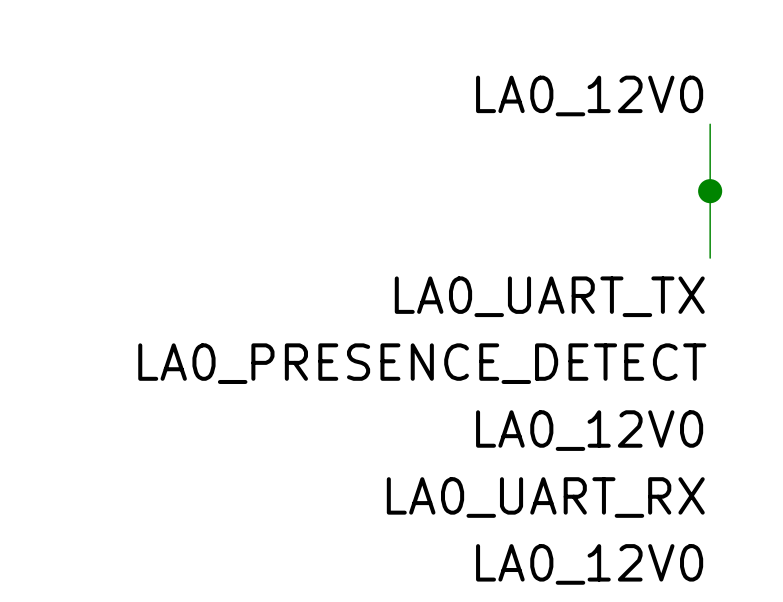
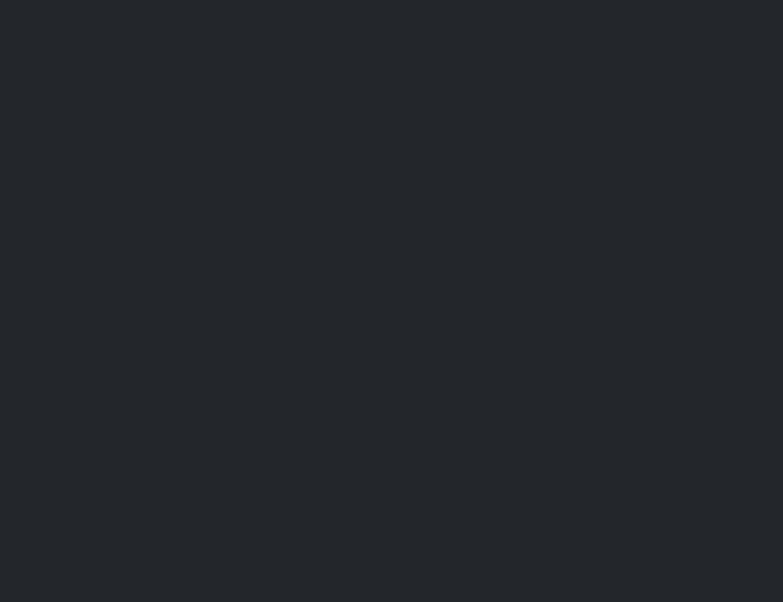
label: LA0_12V0 (589, 95) -> none
wire: (710, 124) (710, 258) -> none
junction: (710, 191) -> none
label: LA0_UART_TX (549, 296) -> none
label: LA0_PRESENCE_DETECT (422, 363) -> none
label: LA0_12V0 (589, 430) -> none
label: LA0_UART_RX (545, 497) -> none
label: LA0_12V0 (589, 564) -> none

